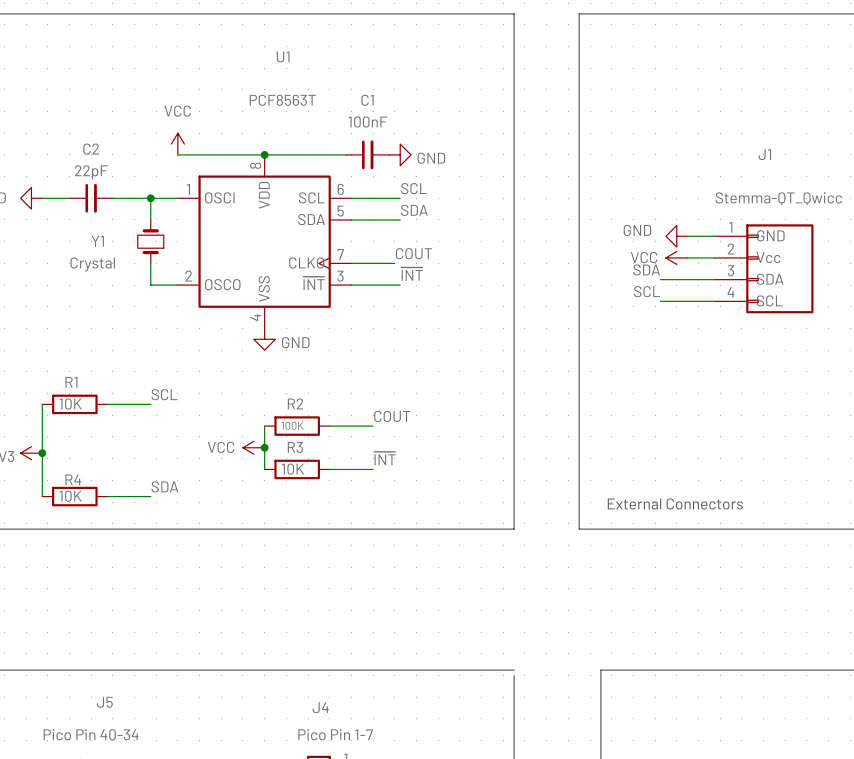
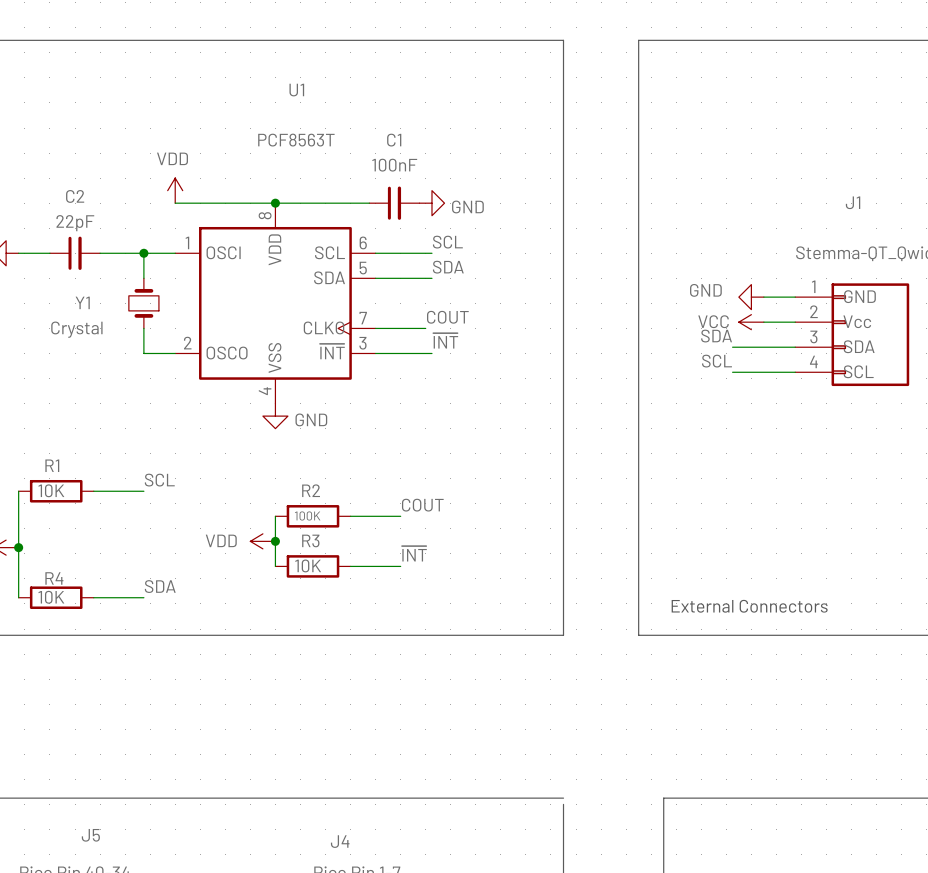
power symbol: VCC (177, 144) -> VDD (175, 190)
power symbol: VCC (253, 447) -> VDD (262, 541)

